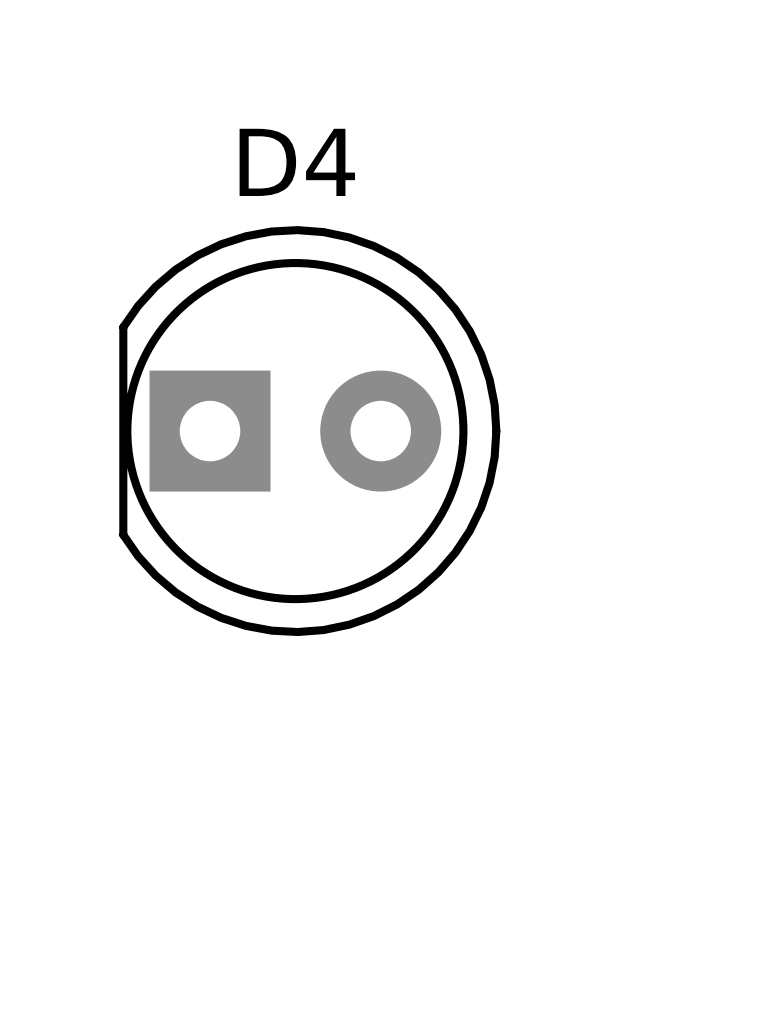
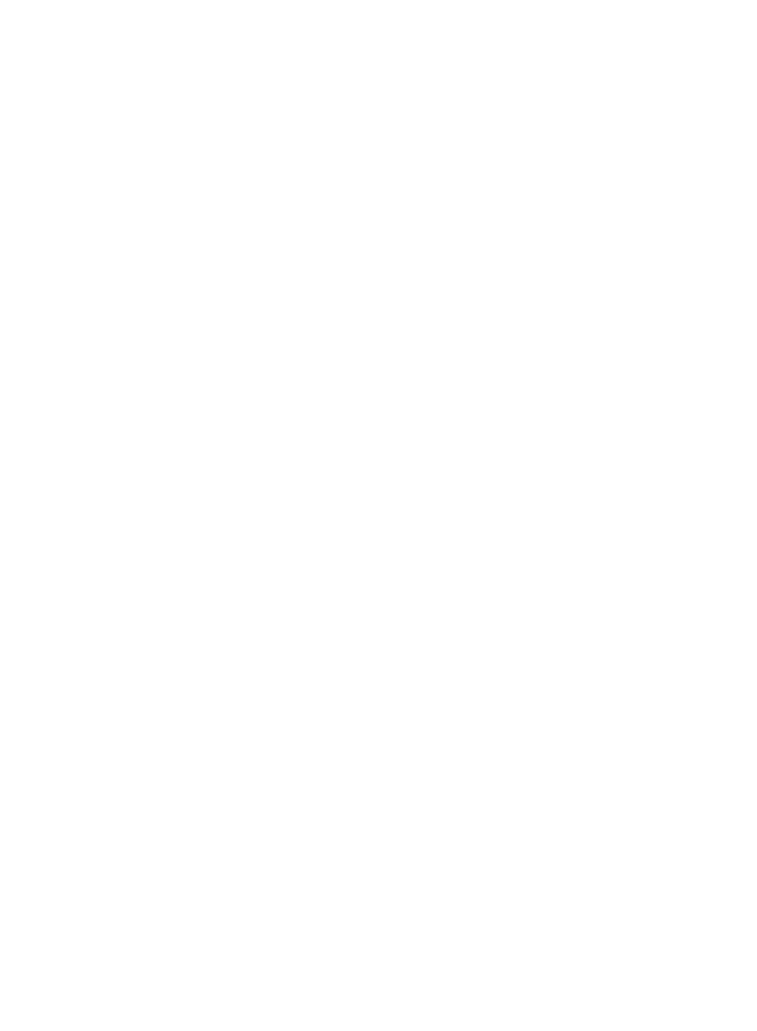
D4: (309, 431) -> none

